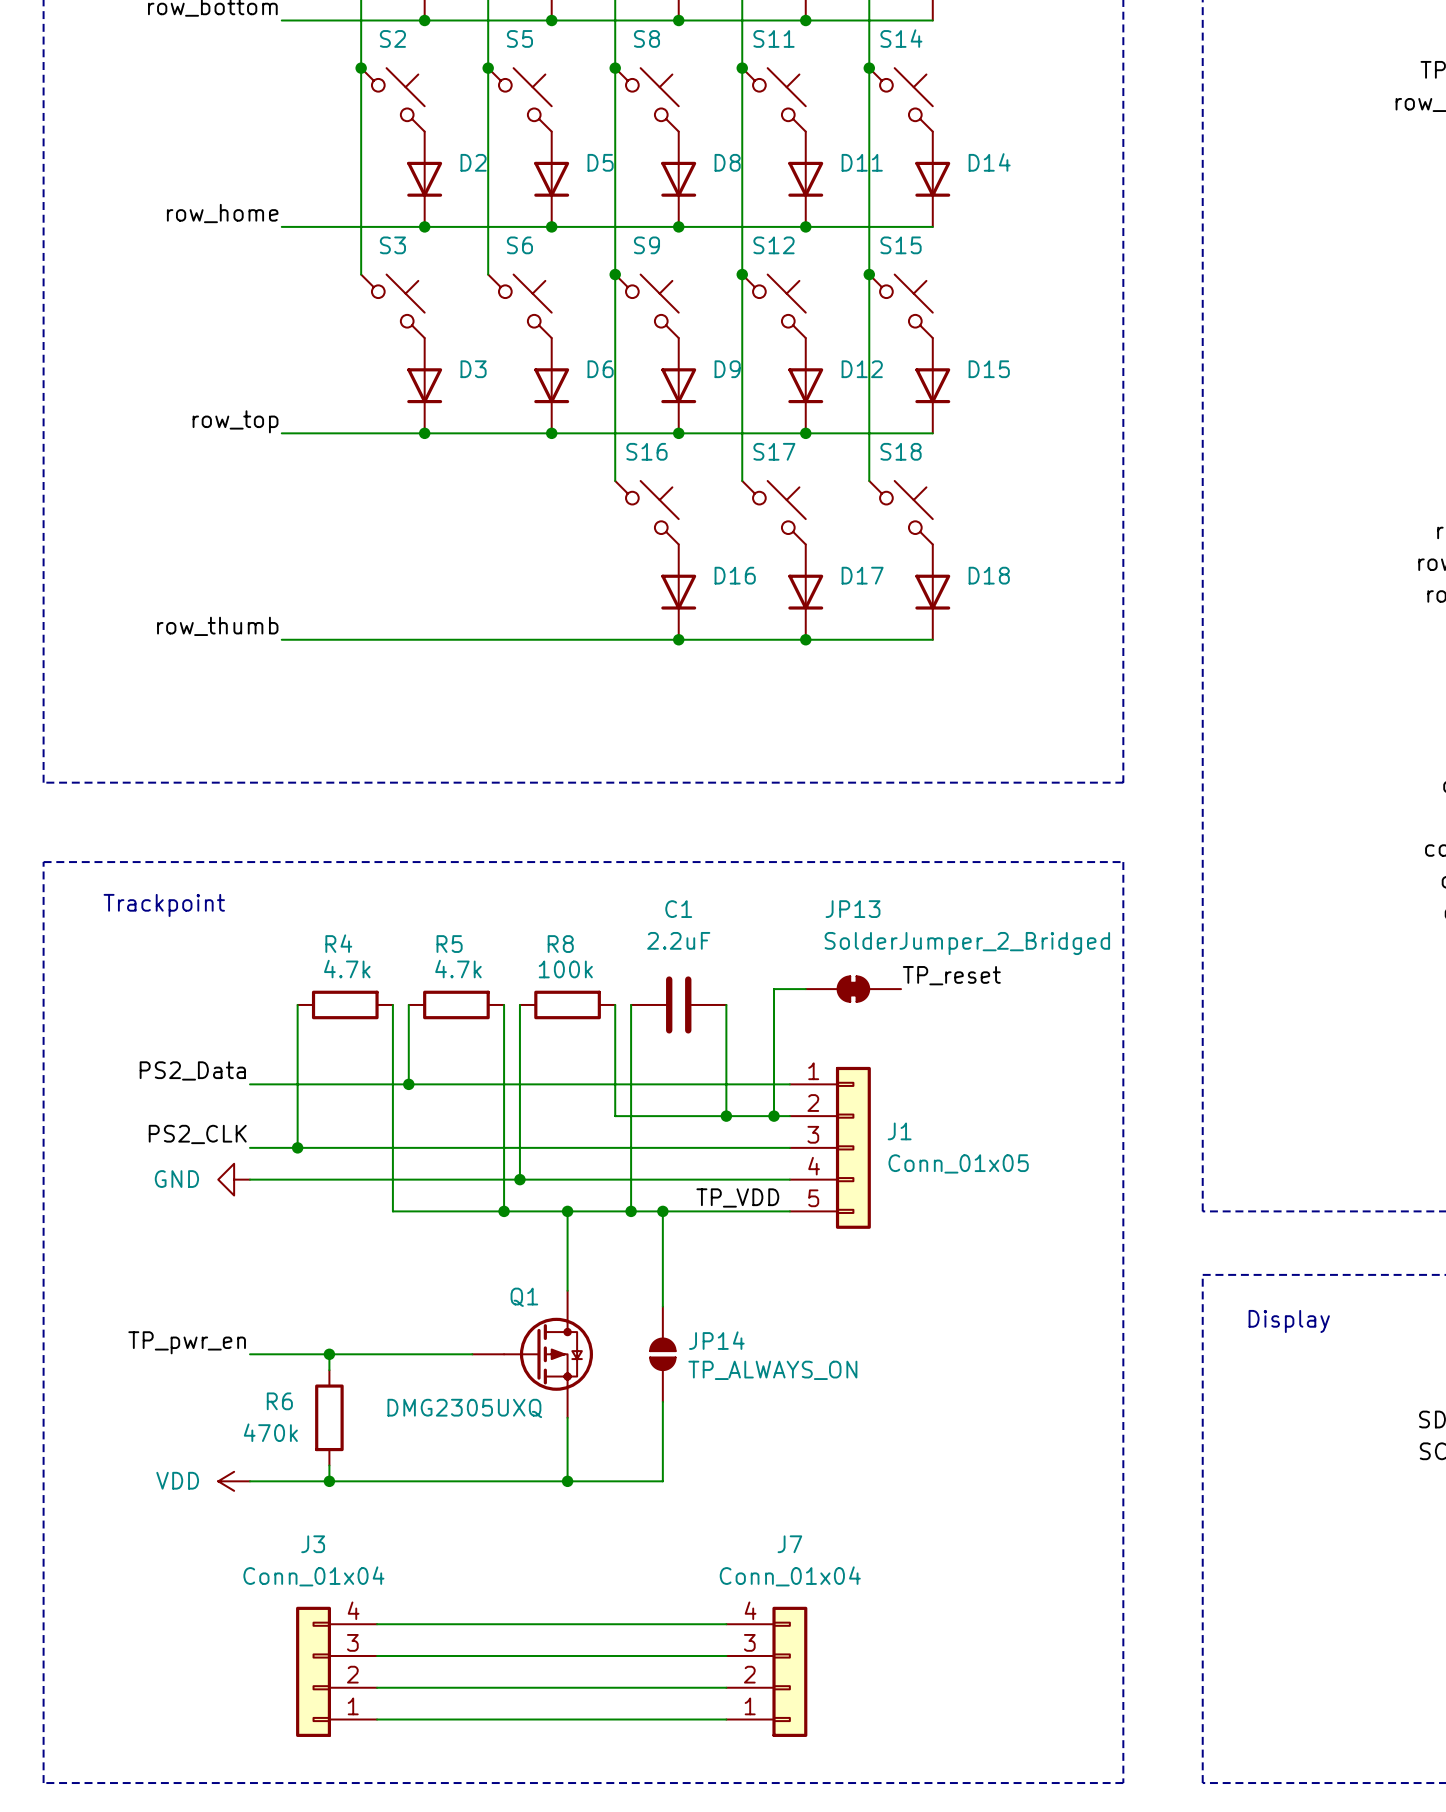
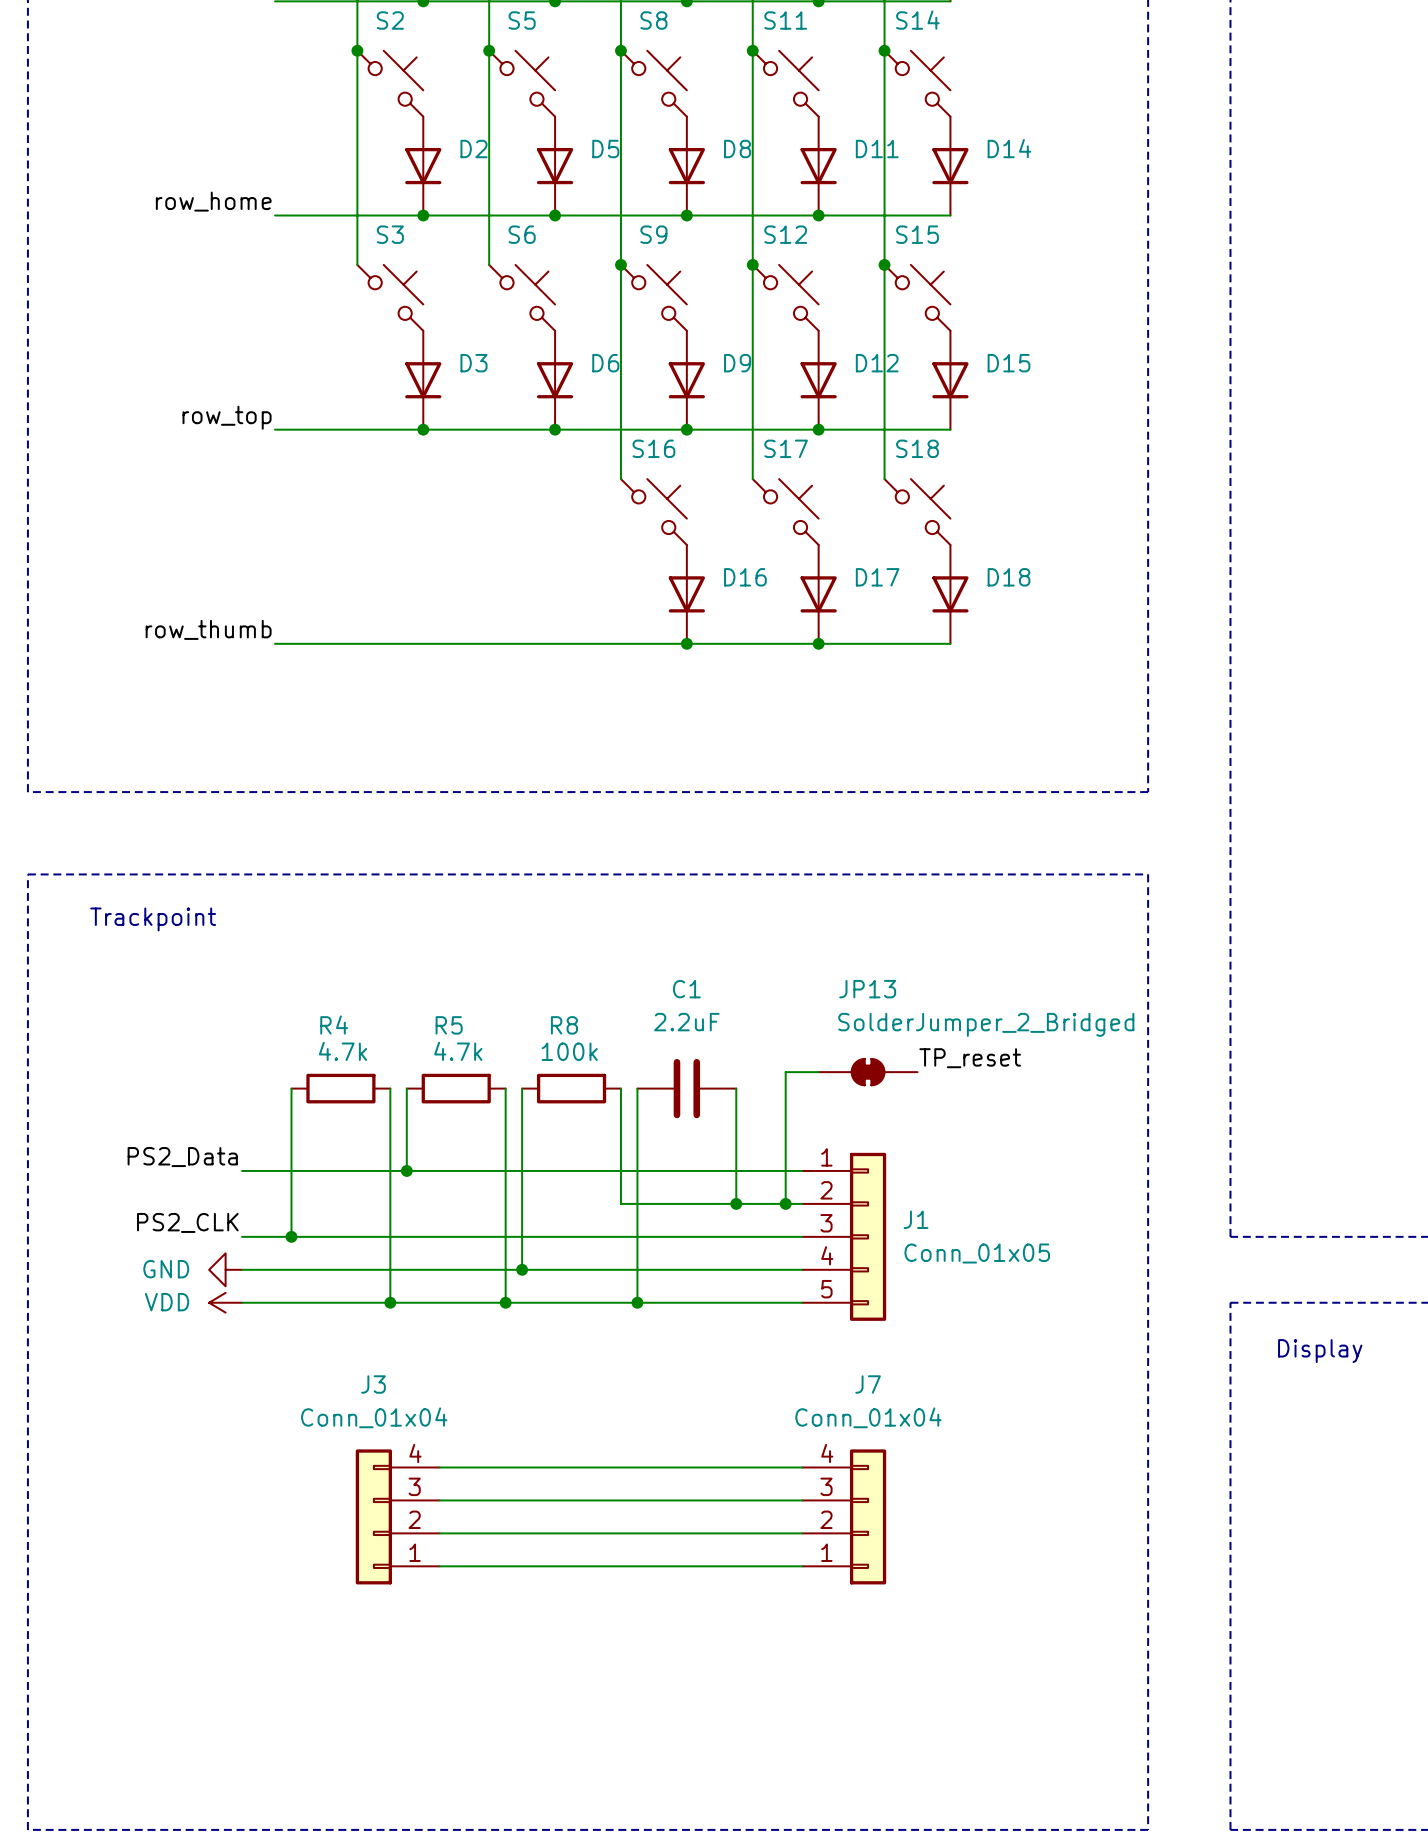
label position: TP_reset (951, 975) -> TP_reset (970, 1058)
wire: (805, 989) (774, 989) (774, 1052) -> (818, 1072) (785, 1072)
JP13 position: (853, 989) -> (868, 1072)
wire: (297, 1004) (297, 1068) -> (291, 1170) (291, 1236)
R4 position: (345, 1004) -> (340, 1088)
wire: (392, 1004) (392, 1068) -> none
wire: (408, 1004) (408, 1068) -> (406, 1105) (406, 1170)
R5 position: (456, 1004) -> (456, 1088)
wire: (504, 1004) (504, 1068) -> (505, 1236) (505, 1302)
wire: (519, 1004) (519, 1068) -> (522, 1203) (522, 1269)
R8 position: (567, 1004) -> (571, 1088)
wire: (615, 1004) (615, 1068) -> (785, 1138) (785, 1203)
wire: (631, 1004) (631, 1068) -> (637, 1236) (637, 1302)
C1 position: (678, 1004) -> (686, 1088)
wire: (726, 1004) (726, 1068) -> (736, 1138) (736, 1203)
label: PS2_Data (192, 1070) -> none
wire: (250, 1084) (789, 1084) -> (242, 1269) (802, 1269)
junction: (408, 1084) -> none
wire: (615, 1116) (789, 1116) -> (620, 1138) (620, 1203)
junction: (726, 1116) -> none
junction: (774, 1116) -> none
label: PS2_CLK (197, 1134) -> PS2_Data (182, 1157)
junction: (297, 1147) -> none
junction: none -> (406, 1170)
J1 position: (830, 1147) -> (844, 1236)
power symbol position: GND (234, 1179) -> GND (225, 1269)
wire: (250, 1179) (615, 1179) -> none
junction: (519, 1179) -> none
junction: none -> (736, 1203)
junction: none -> (785, 1203)
label: none -> PS2_CLK (187, 1222)
label: TP_VDD (737, 1197) -> none
wire: none -> (242, 1236) (390, 1236) (390, 1302)
junction: none -> (291, 1236)
junction: (504, 1211) -> none
wire: (567, 1211) (567, 1290) -> none
junction: (567, 1211) -> none
junction: (631, 1211) -> none
wire: (662, 1211) (662, 1306) -> none
junction: (662, 1211) -> none
junction: none -> (522, 1269)
wire: none -> (242, 1302) (802, 1302)
junction: none -> (390, 1302)
junction: none -> (505, 1302)
junction: none -> (637, 1302)
label: TP_pwr_en (187, 1342) -> none
wire: (250, 1354) (472, 1354) -> none
wire: (329, 1354) (329, 1370) -> none
junction: (329, 1354) -> none
Q1: DMG2305UXQ (532, 1354) -> none
JP14: TP_ALWAYS_ON (662, 1354) -> none
wire: (662, 1401) (662, 1481) (250, 1481) -> none
R6: 470k (329, 1417) -> none
wire: (567, 1417) (567, 1481) -> none
wire: (329, 1465) (329, 1481) -> none
power symbol position: VDD (234, 1481) -> VDD (225, 1302)
junction: (329, 1481) -> none
junction: (567, 1481) -> none
wire: (377, 1624) (726, 1624) -> (439, 1467) (802, 1467)
wire: (377, 1655) (726, 1655) -> (439, 1500) (802, 1500)
J3 position: (336, 1671) -> (397, 1516)
J7 position: (766, 1671) -> (844, 1516)
wire: (377, 1687) (726, 1687) -> (439, 1533) (802, 1533)
wire: (377, 1719) (726, 1719) -> (439, 1566) (802, 1566)

